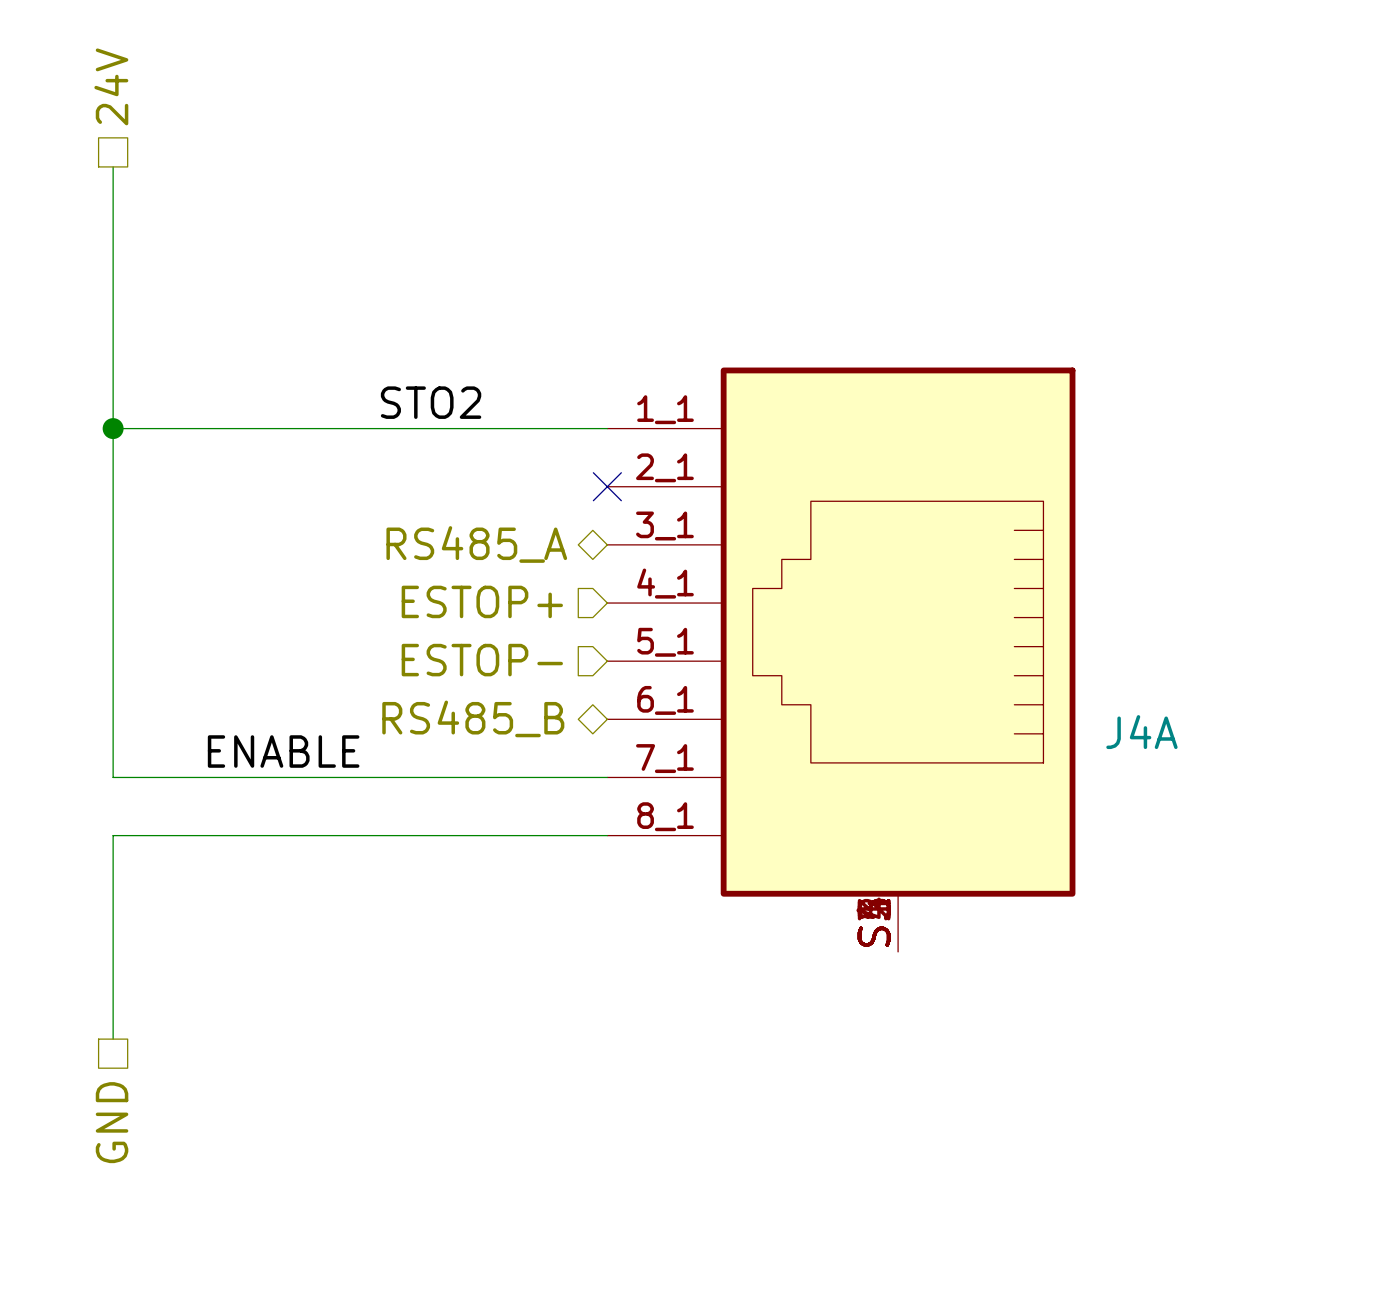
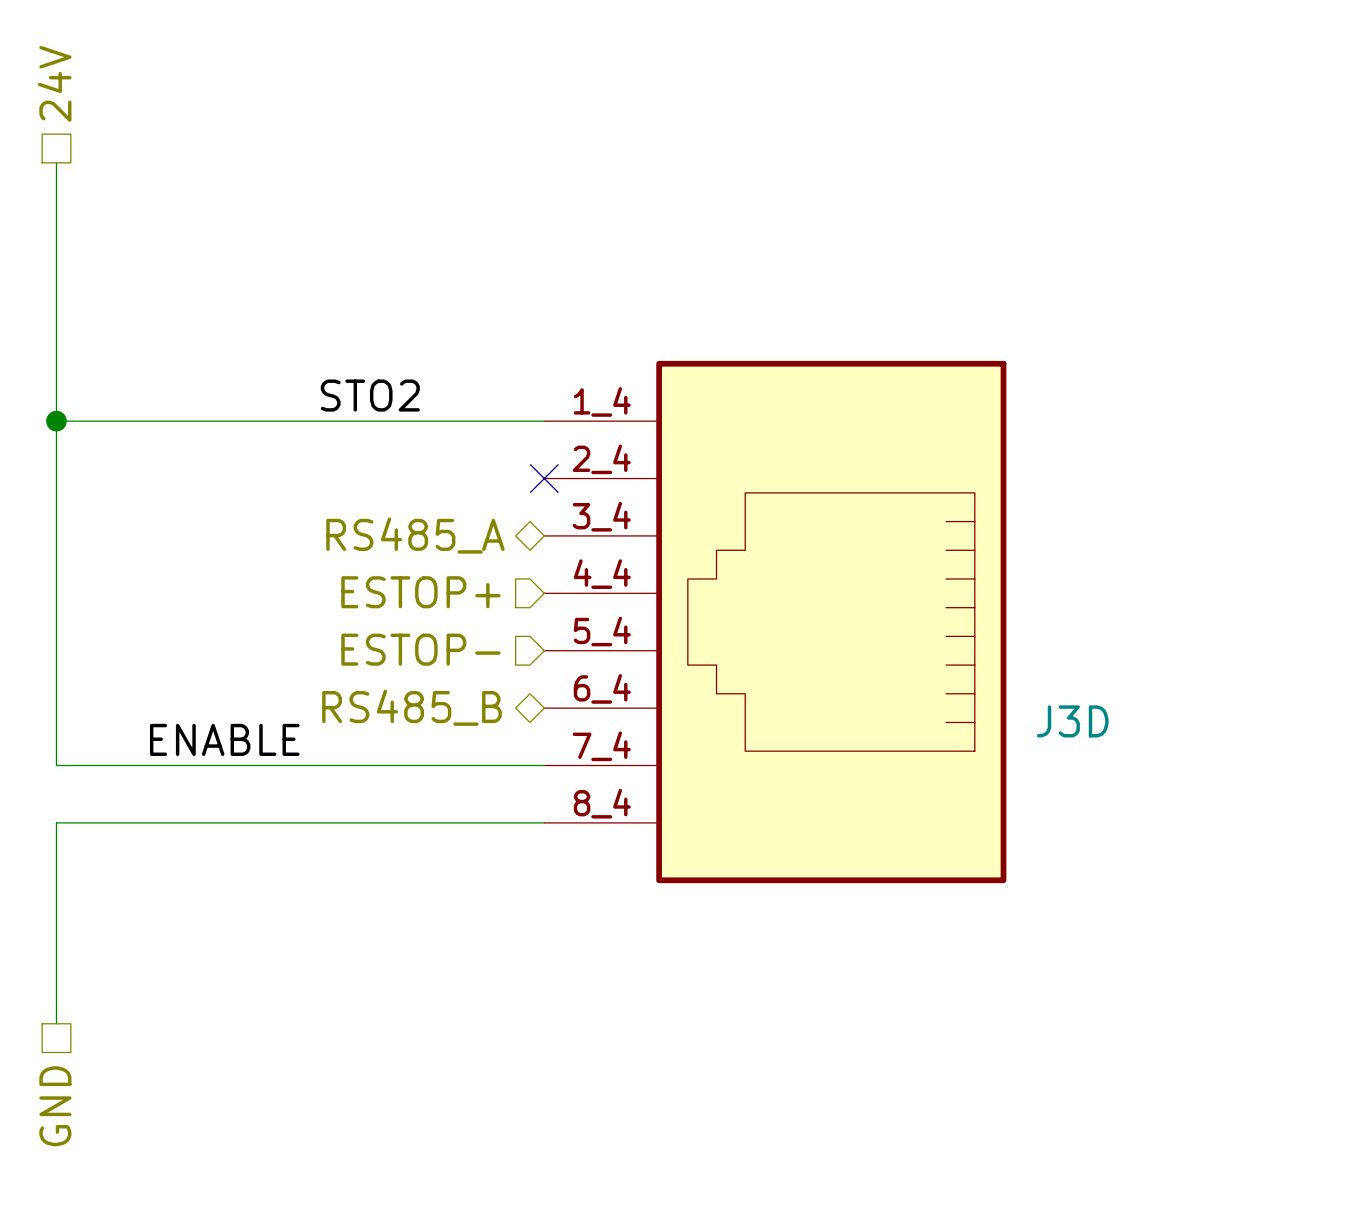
J3D: none -> (775, 622)
J4A: (841, 659) -> none

